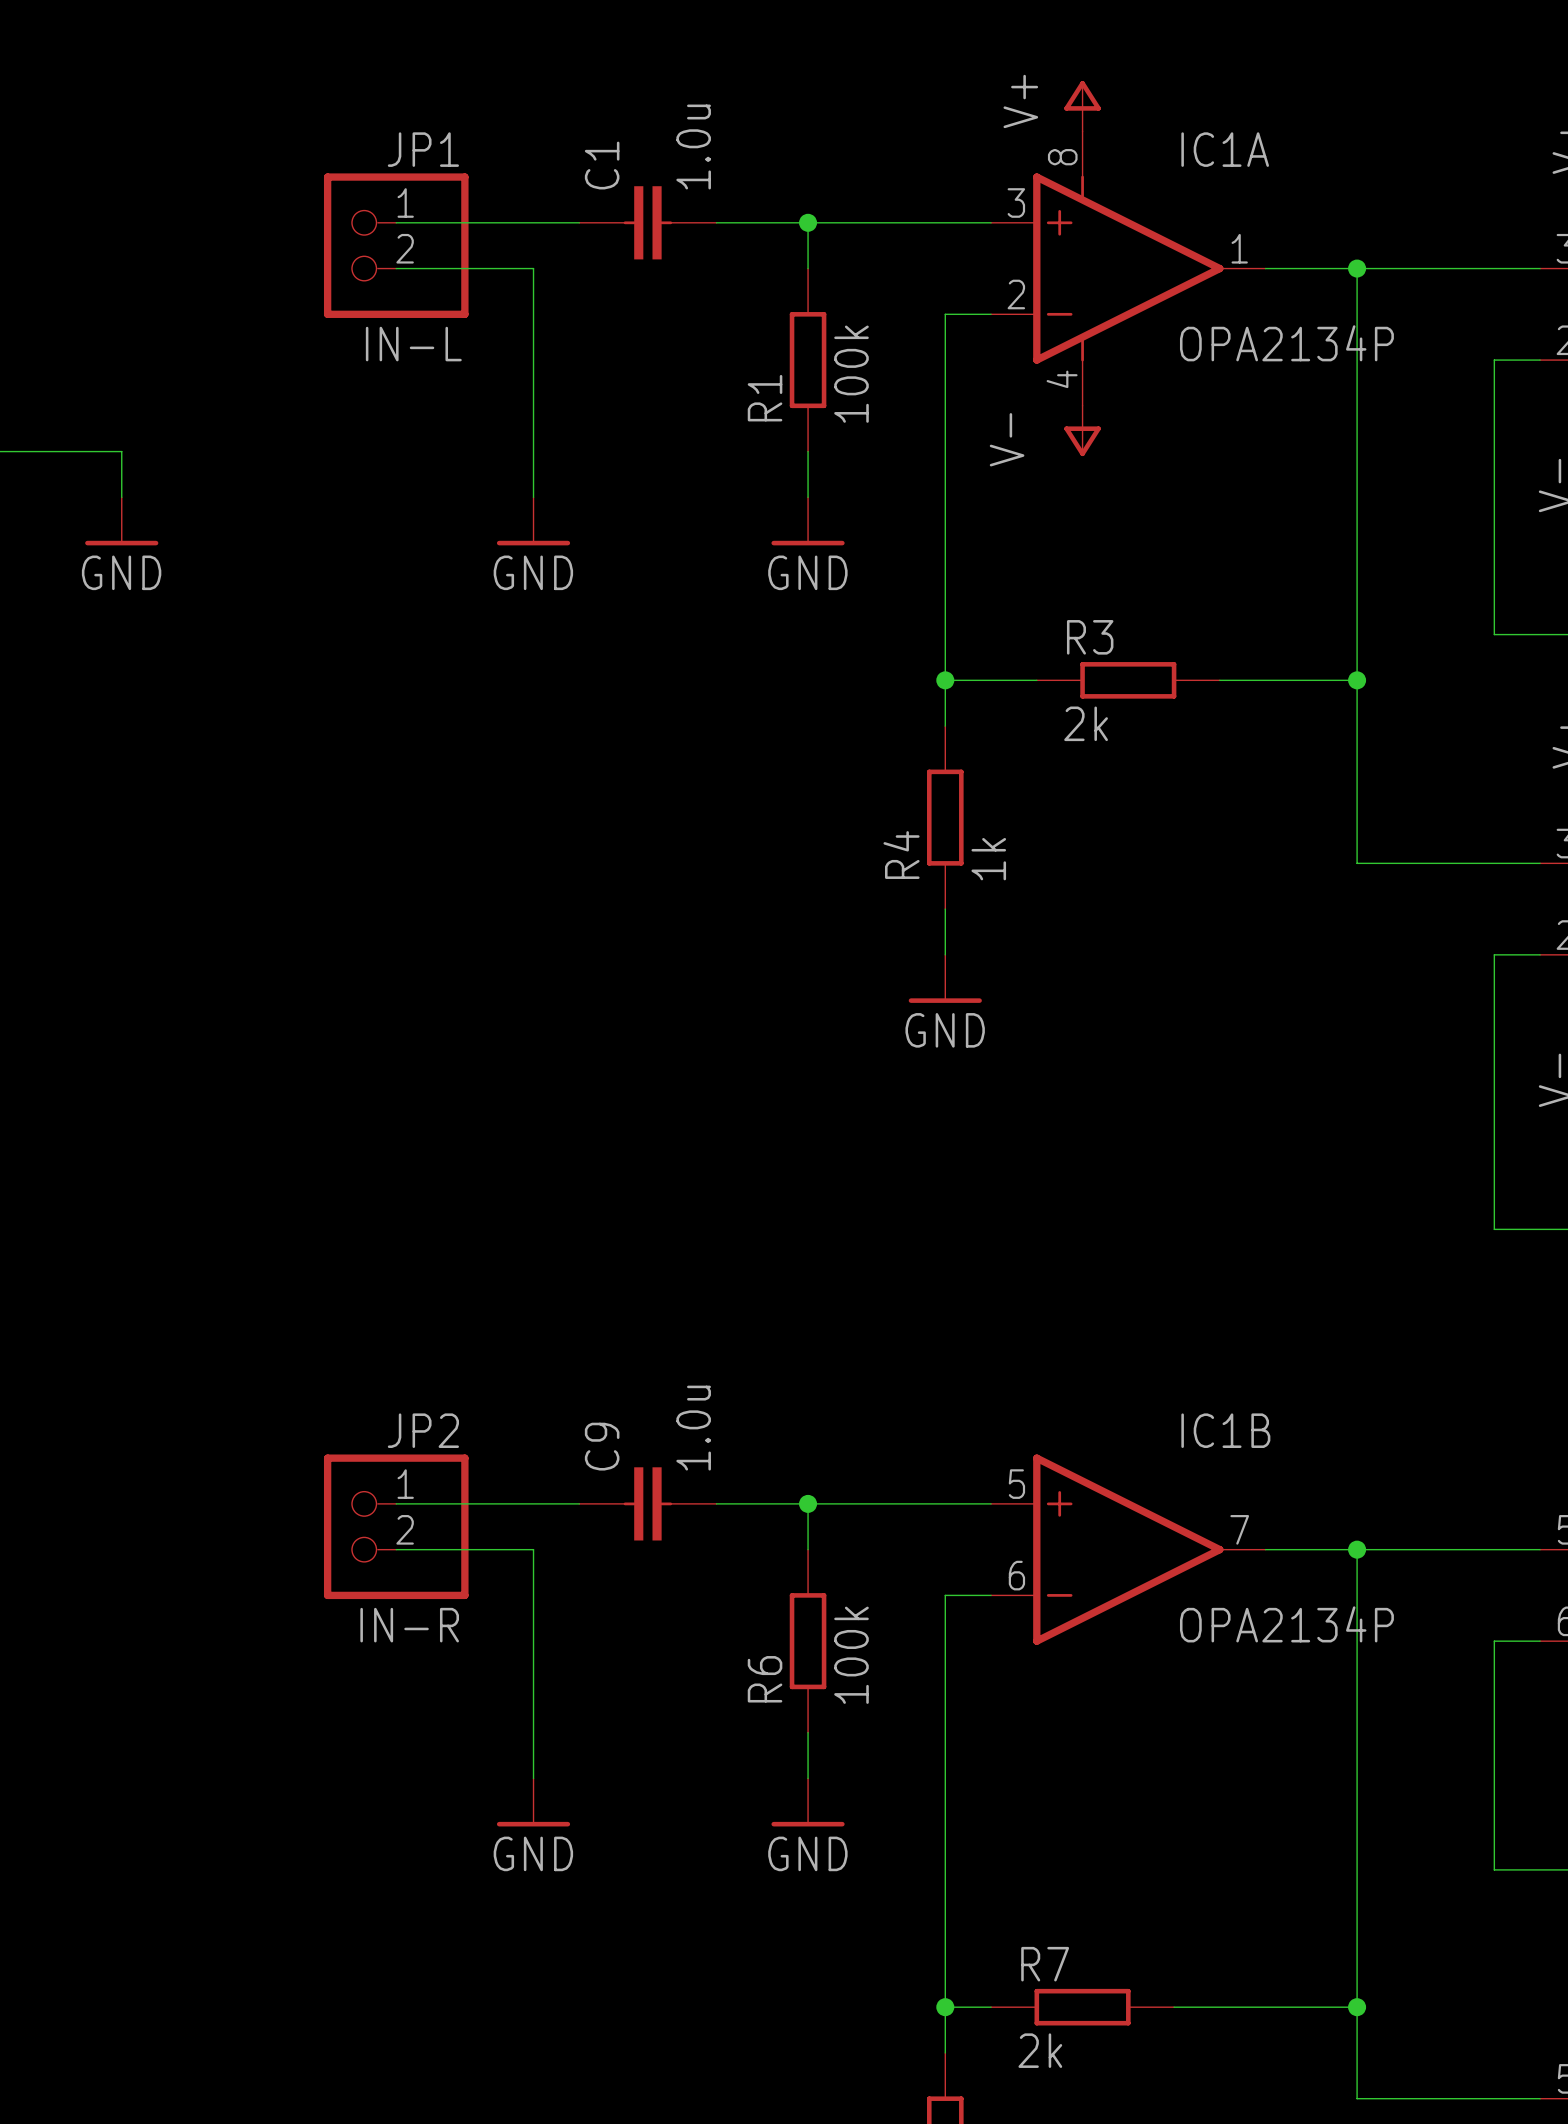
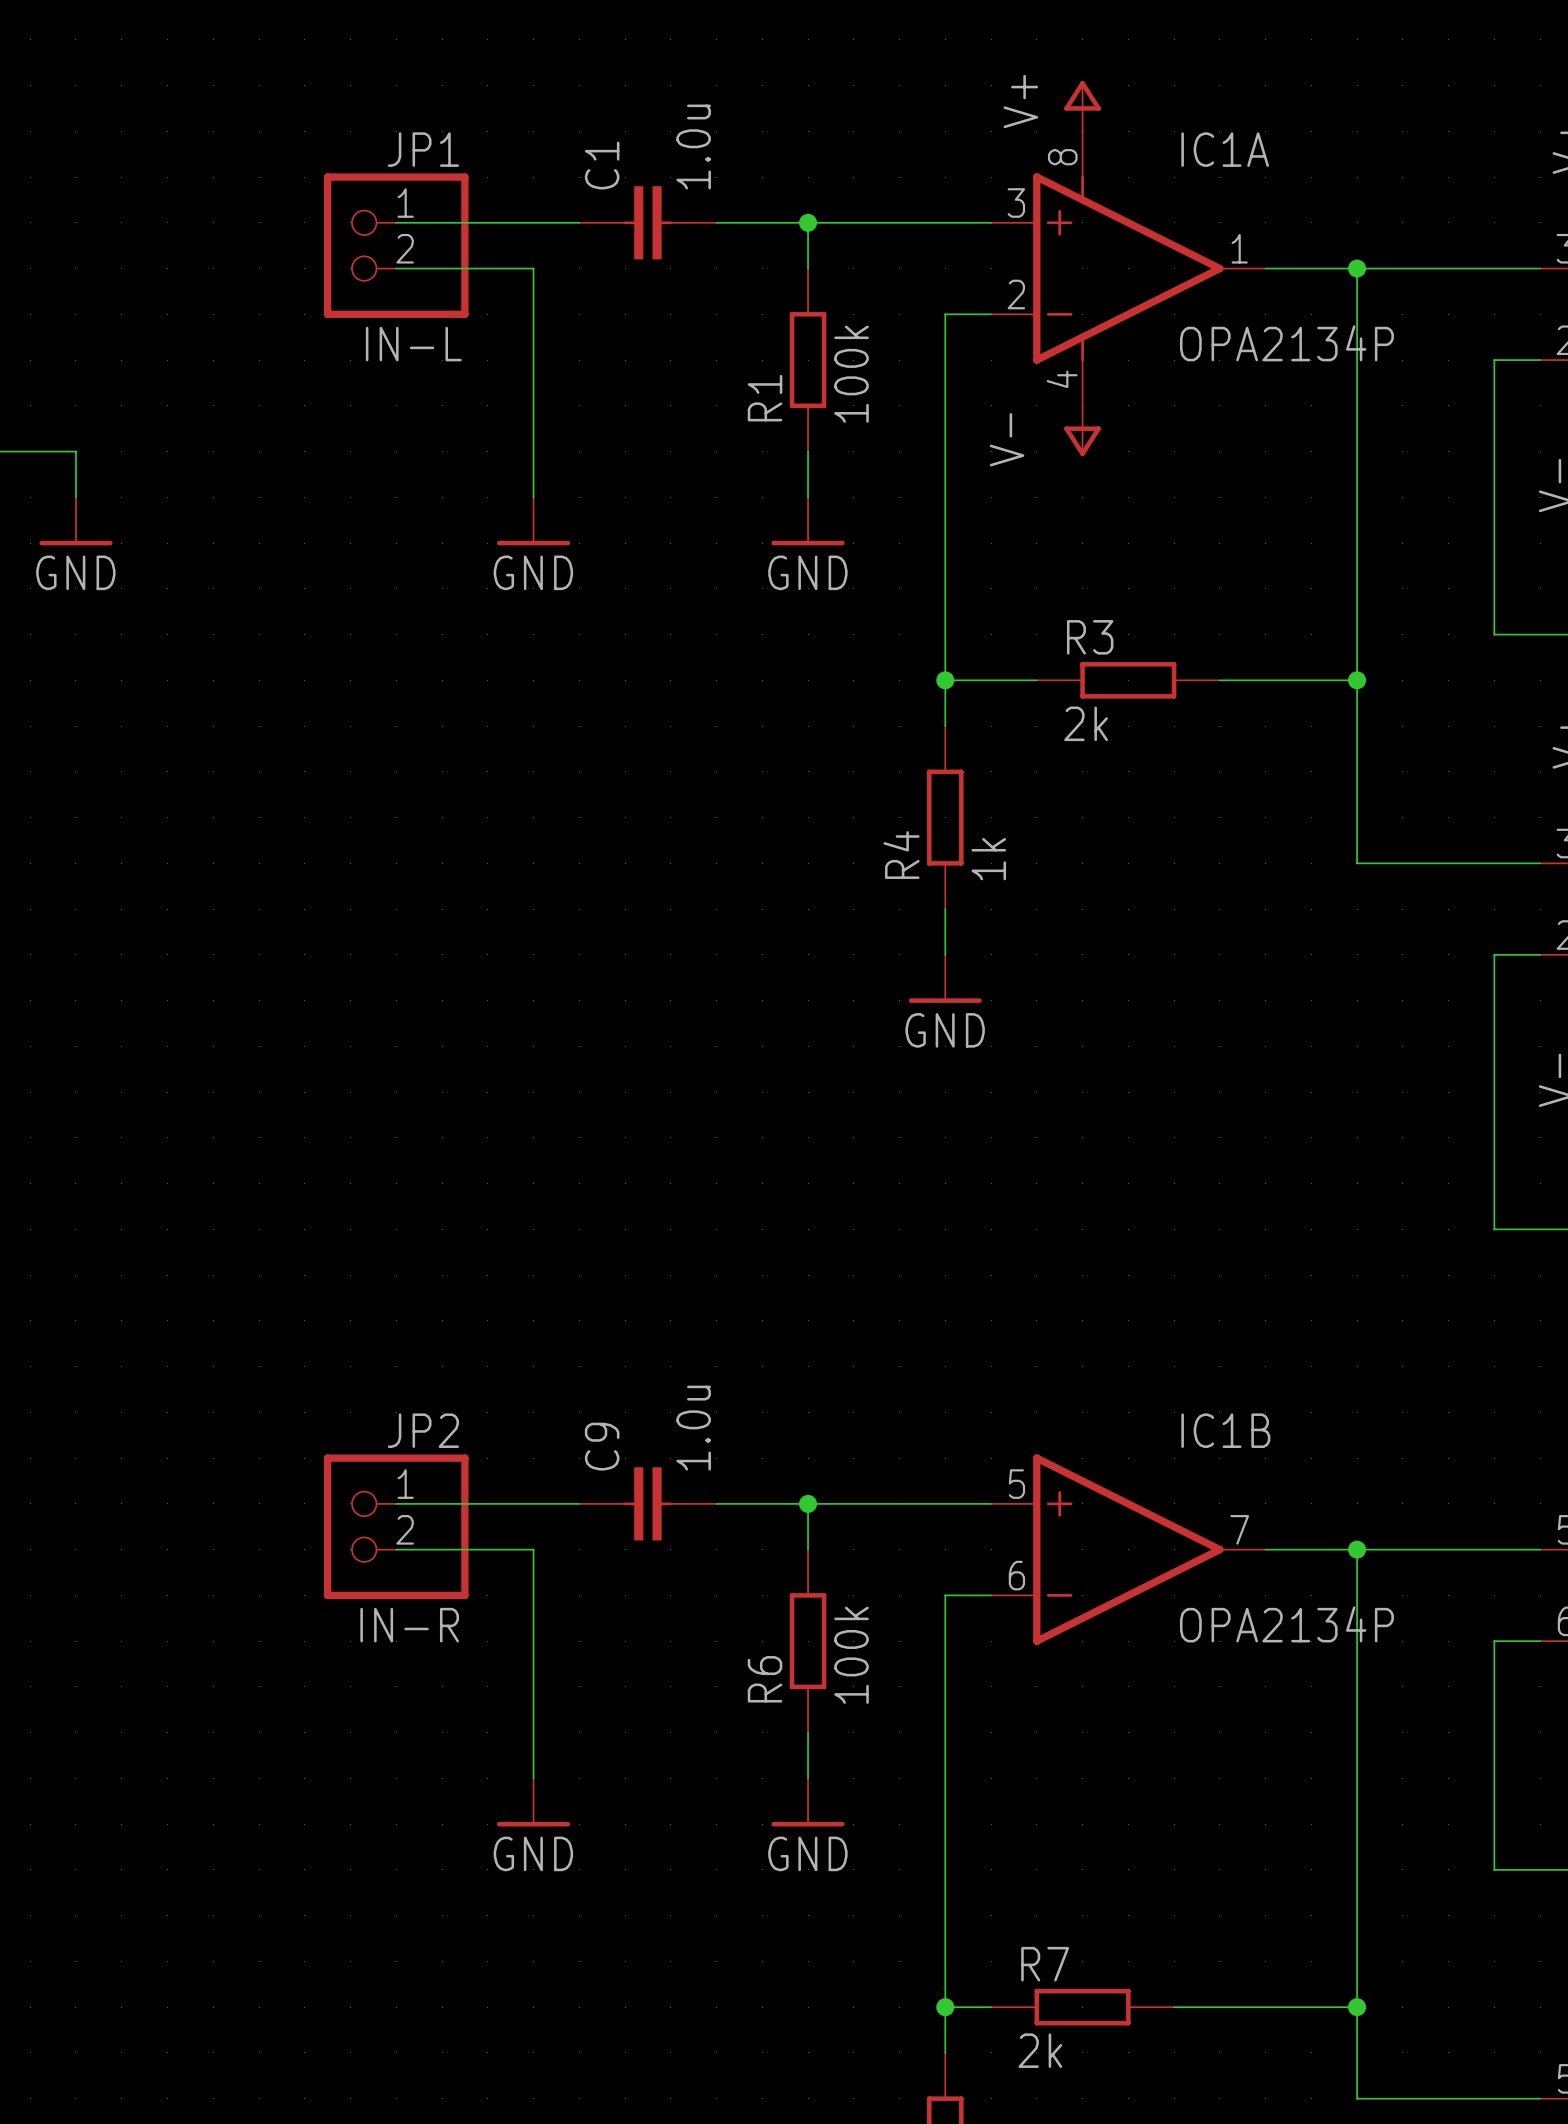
wire: (75, 451) (121, 451) (121, 497) -> (75, 451) (75, 497)
power symbol position: GND (121, 521) -> GND (75, 521)

